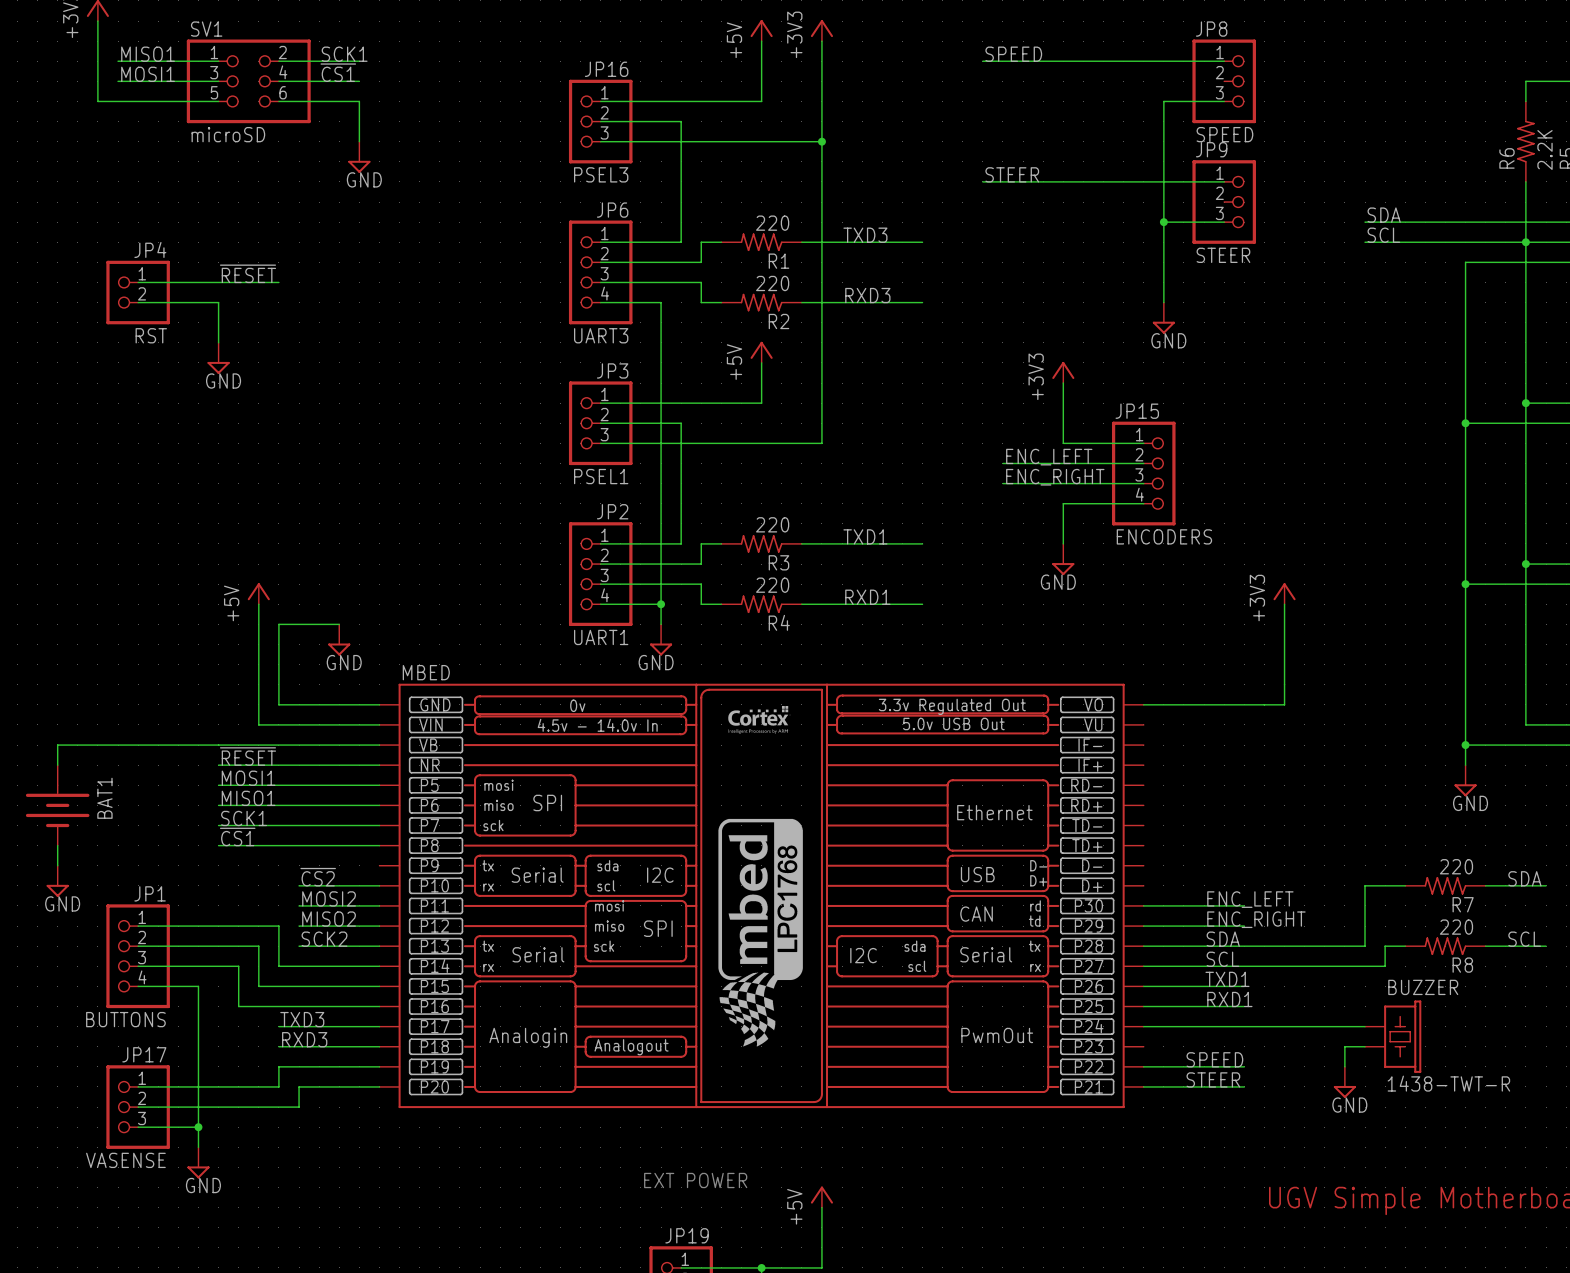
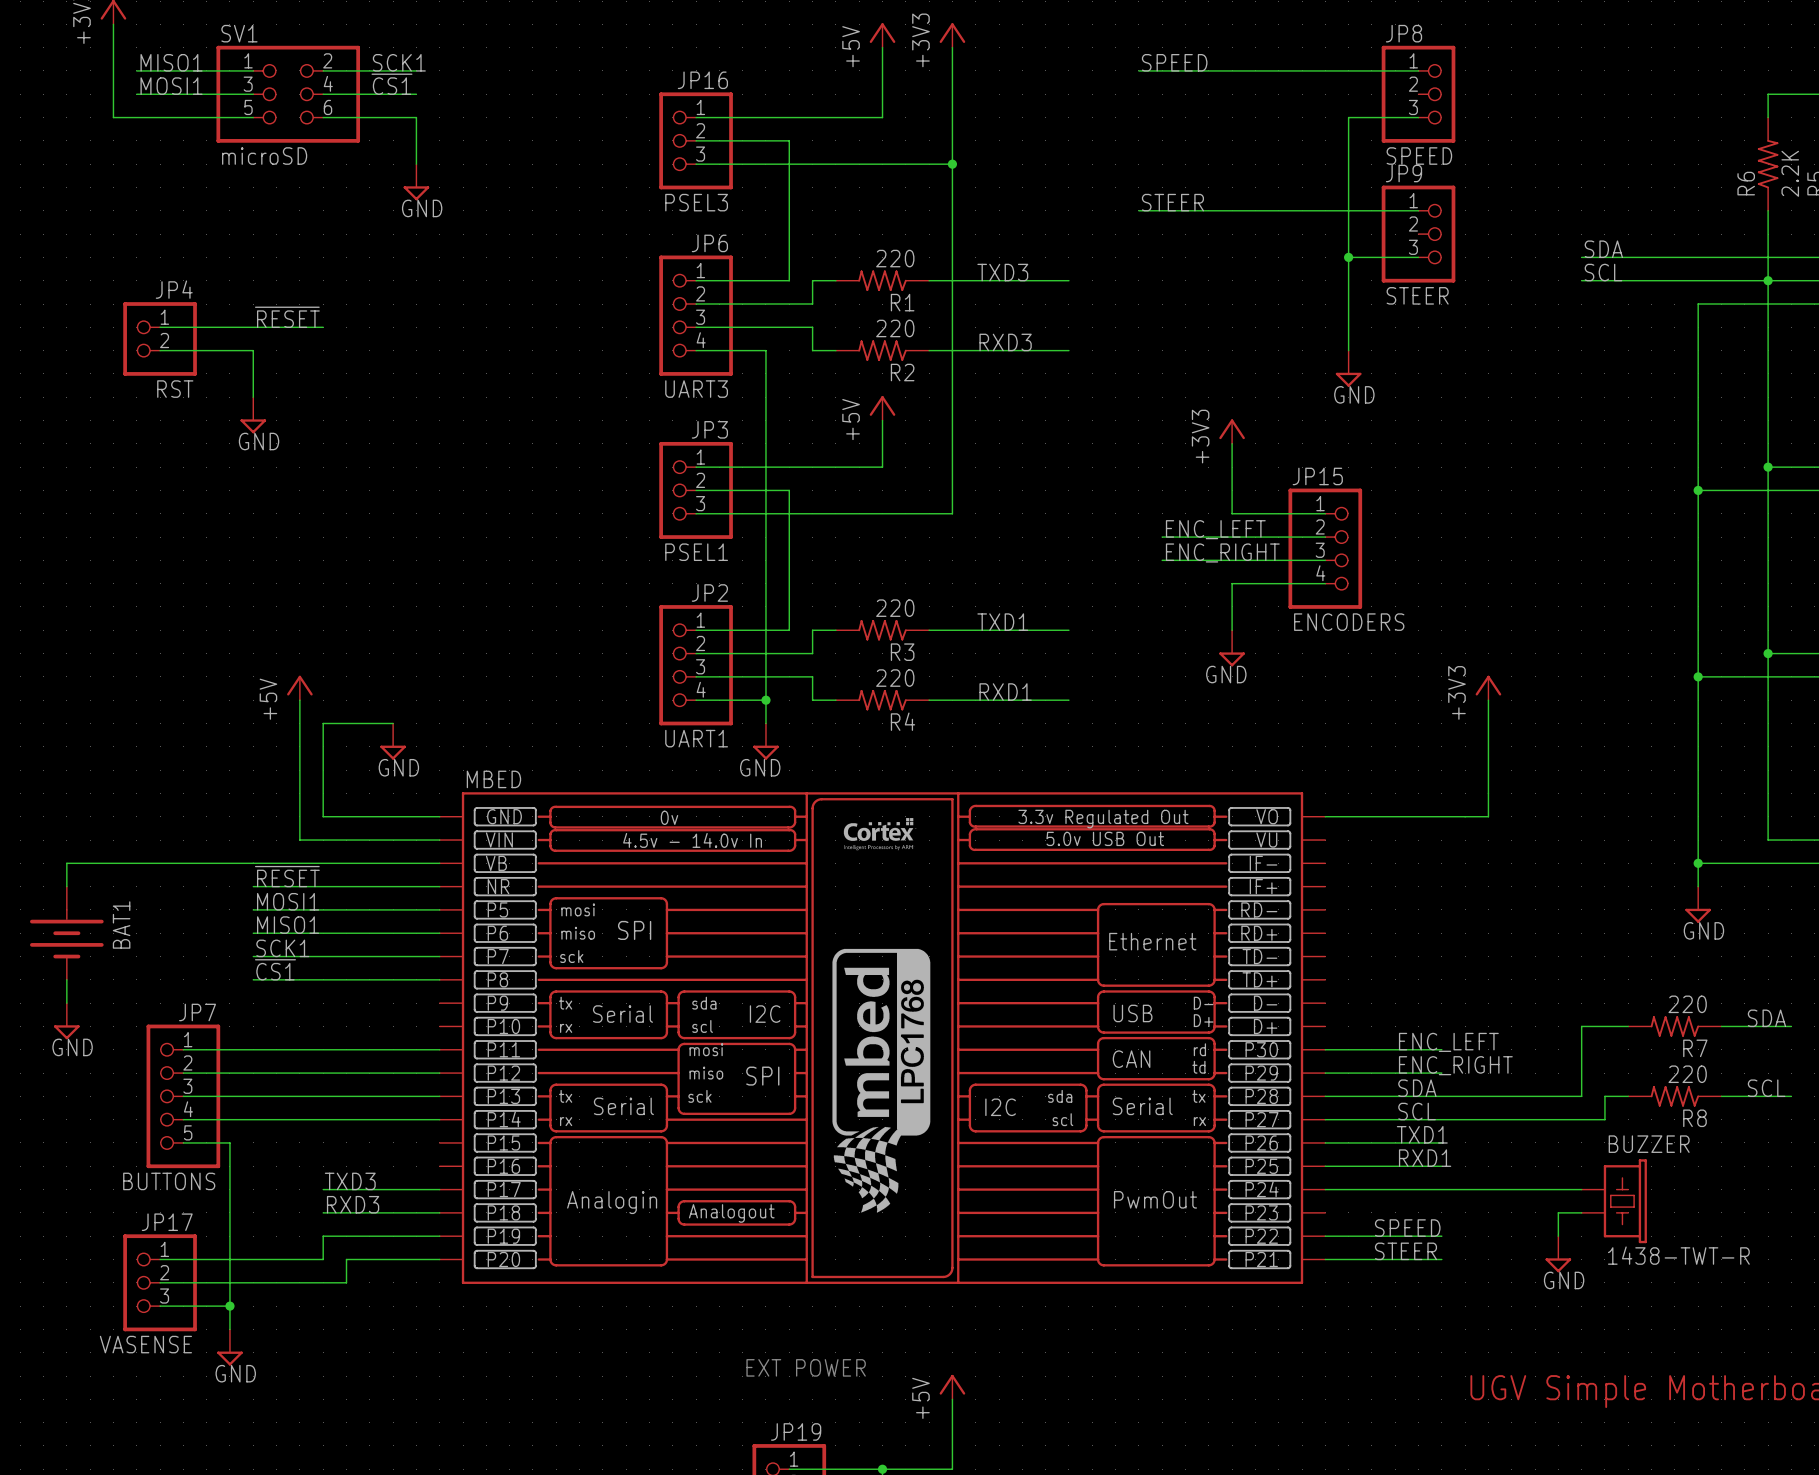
label: ~{CS2} (318, 877) -> none
wire: (299, 885) (379, 885) -> none
label: MOSI2 (329, 898) -> none
wire: none -> (183, 1049) (346, 1049)
label: MISO2 (329, 919) -> none
wire: (138, 926) (158, 926) -> none
wire: (278, 926) (278, 966) -> (323, 1073) (346, 1073)
label: SCK2 (324, 939) -> none
wire: (138, 946) (158, 946) -> none
JP7: none -> BUTTONS (183, 1096)
wire: (258, 946) (258, 986) (379, 986) -> (299, 1096) (346, 1096)
JP1: BUTTONS (138, 956) -> none
wire: (138, 966) (158, 966) -> none
wire: (238, 966) (238, 1006) (379, 1006) -> (276, 1119) (323, 1119)
wire: (138, 986) (158, 986) -> none

